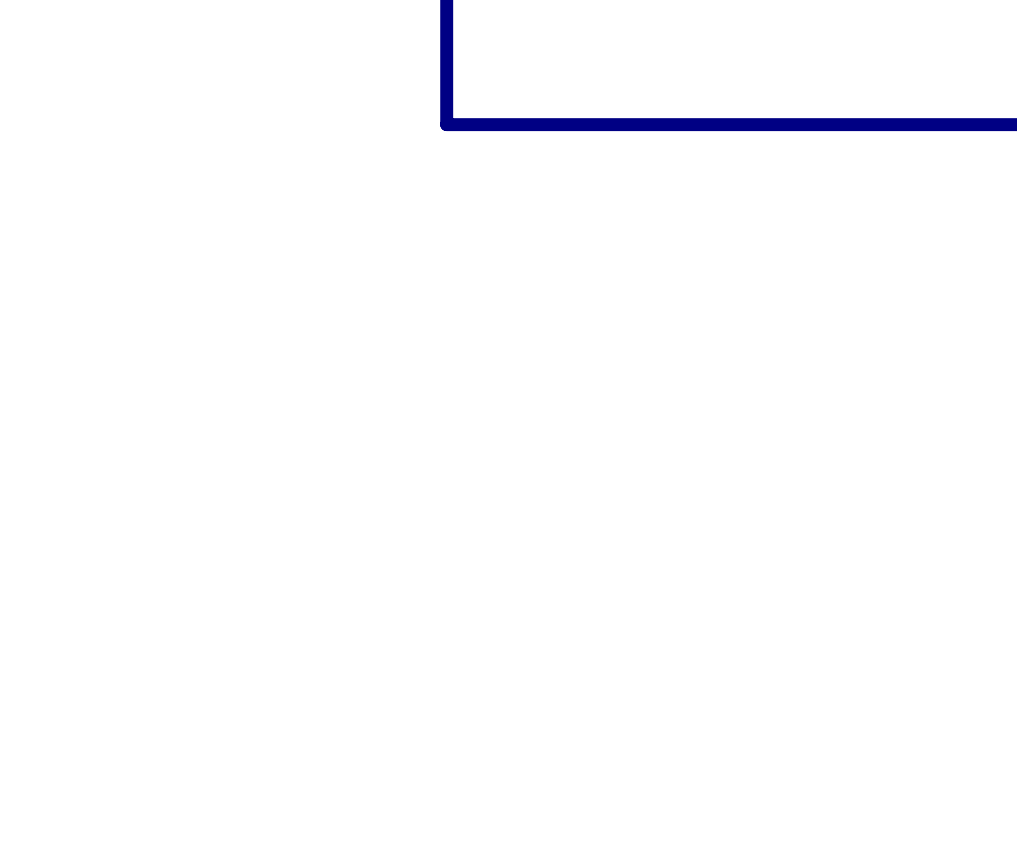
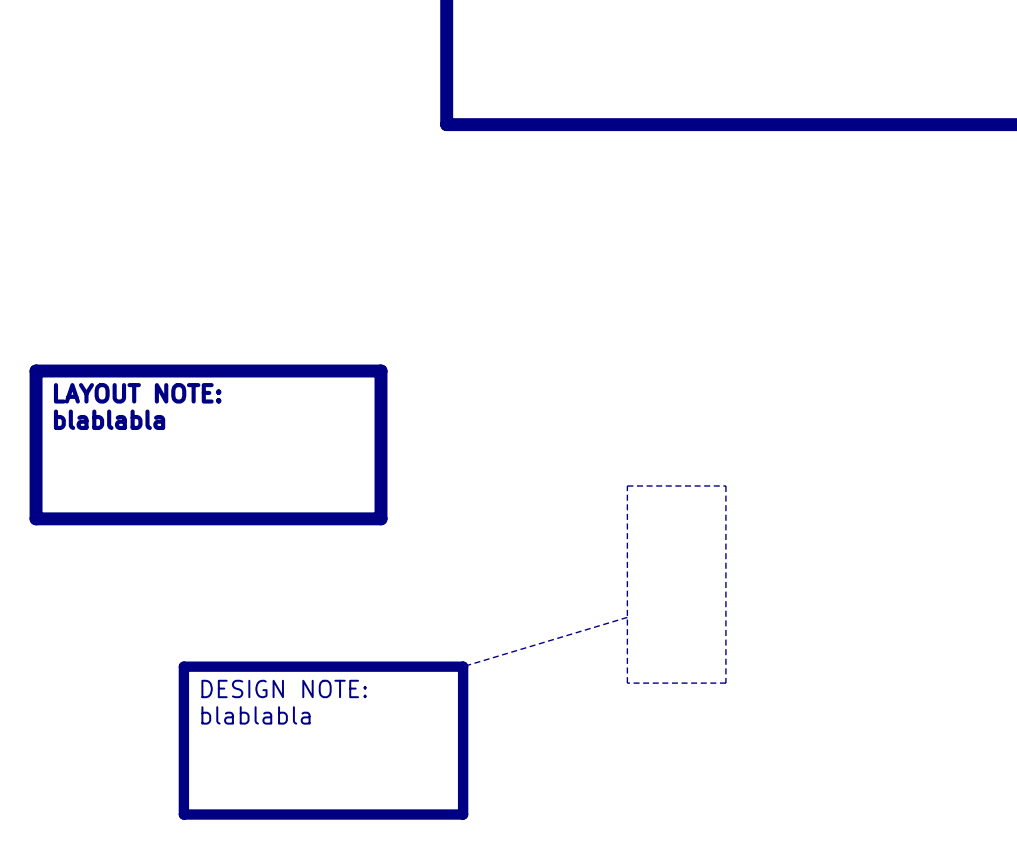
line: none -> (36, 371) (380, 371) (380, 518) (36, 518) (36, 371)
text: none -> LAYOUT NOTE: (137, 393)
text: none -> blablabla (109, 419)
line: none -> (627, 485) (725, 485) (725, 683) (627, 683) (627, 485)
line: none -> (627, 617) (463, 666)
line: none -> (463, 666) (183, 666) (183, 814) (463, 814) (463, 666)
text: none -> DESIGN NOTE: (284, 688)
text: none -> blablabla (255, 715)

